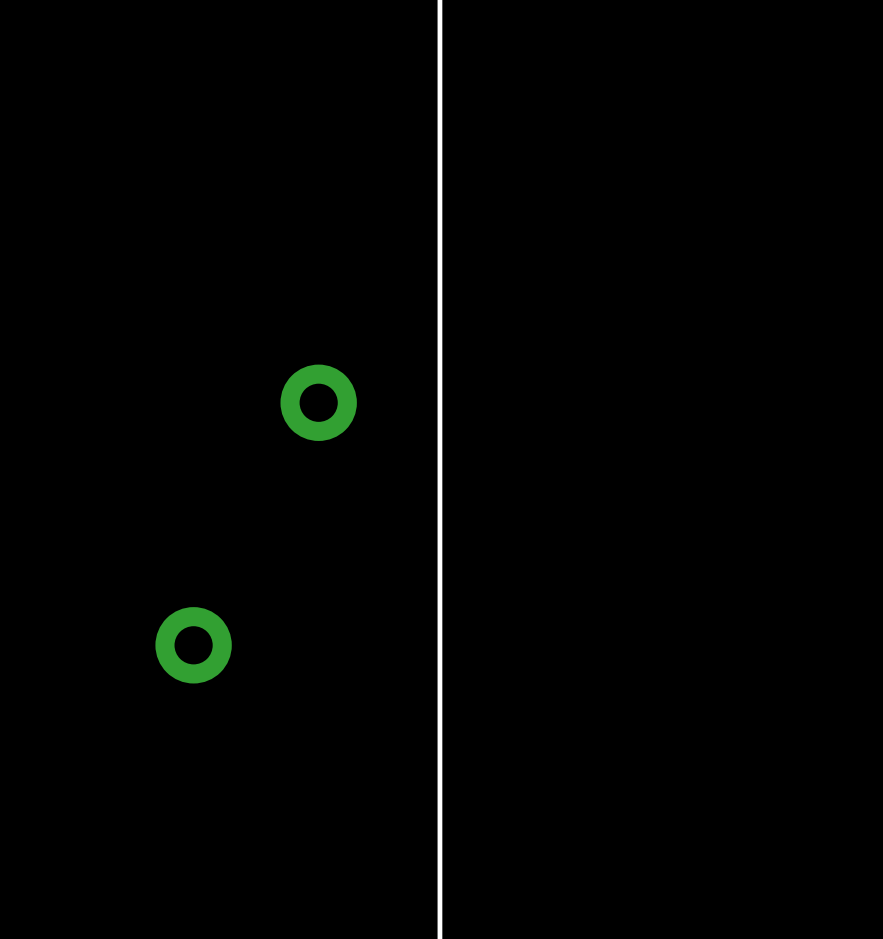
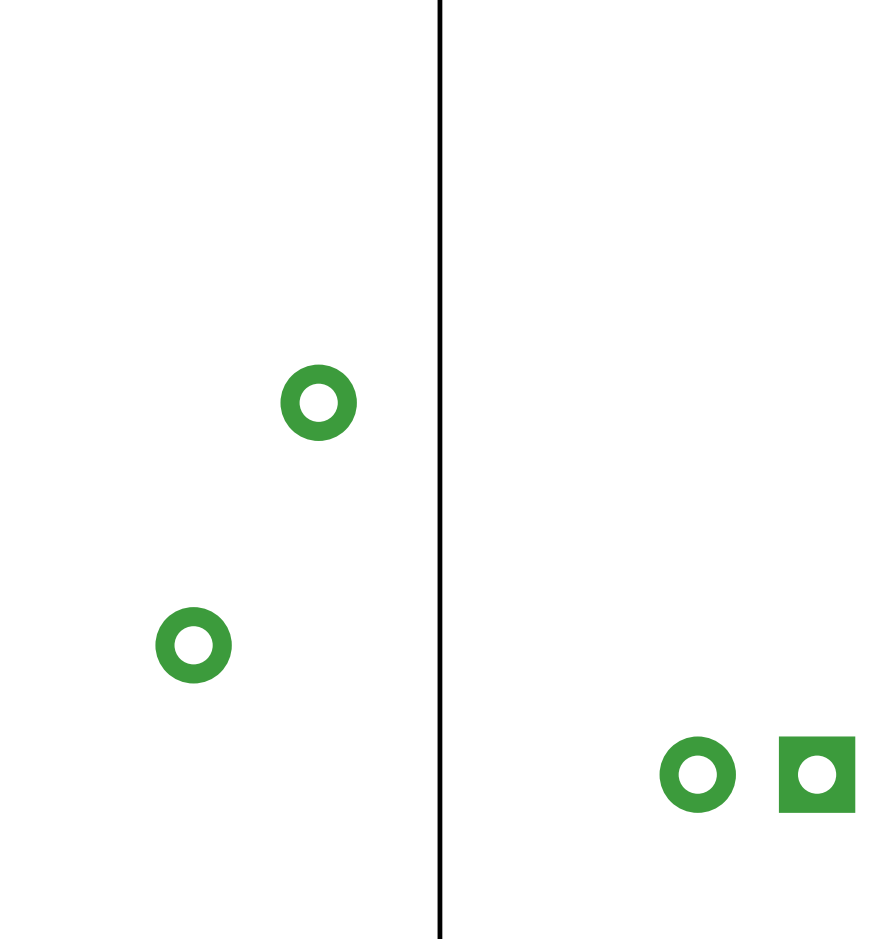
part: none -> (757, 774)

